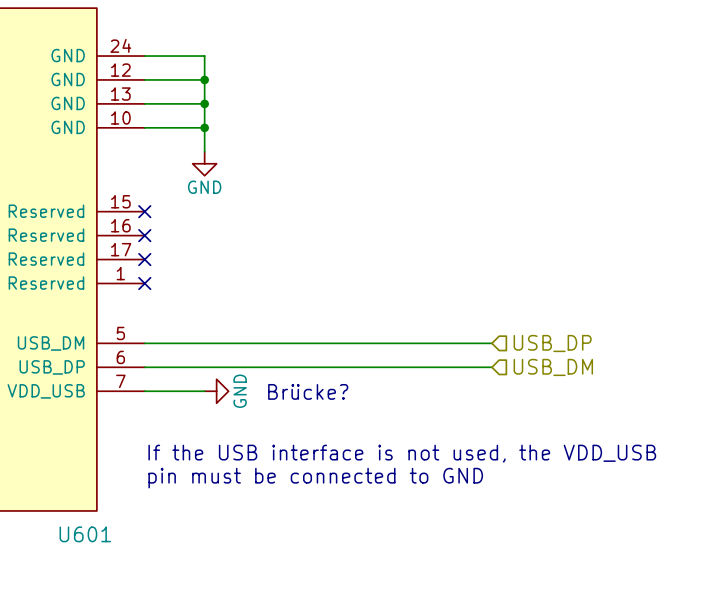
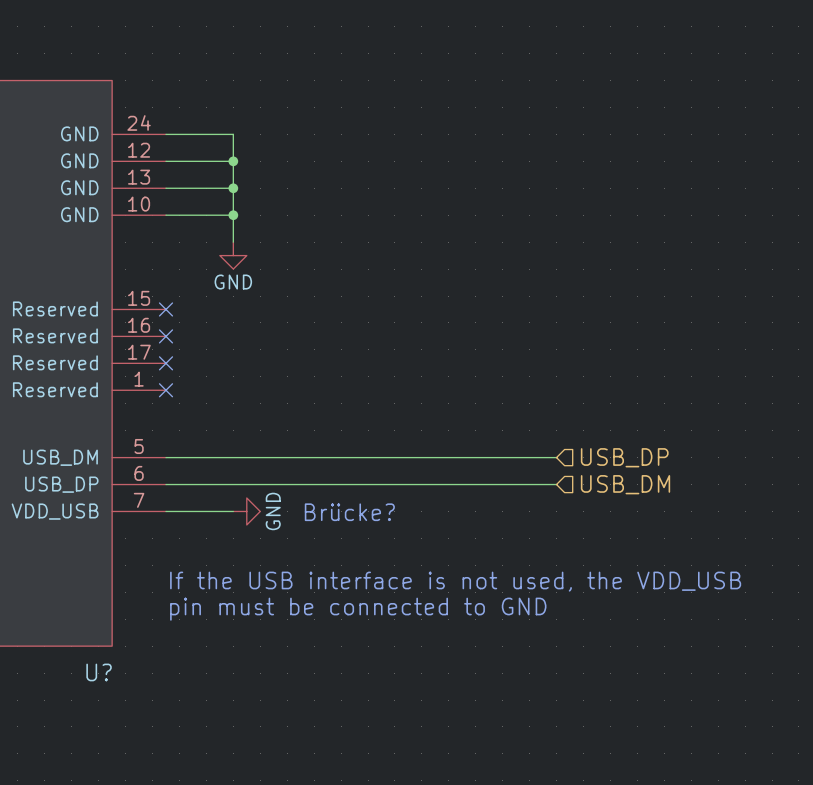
U601 name: U601 (85, 534) -> U? (99, 672)

